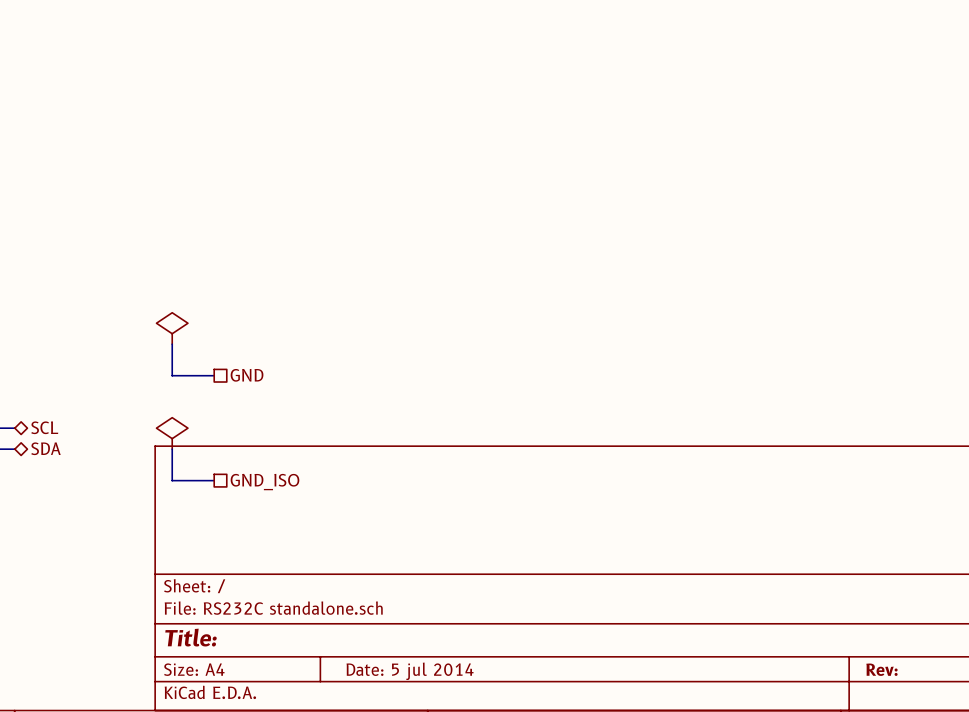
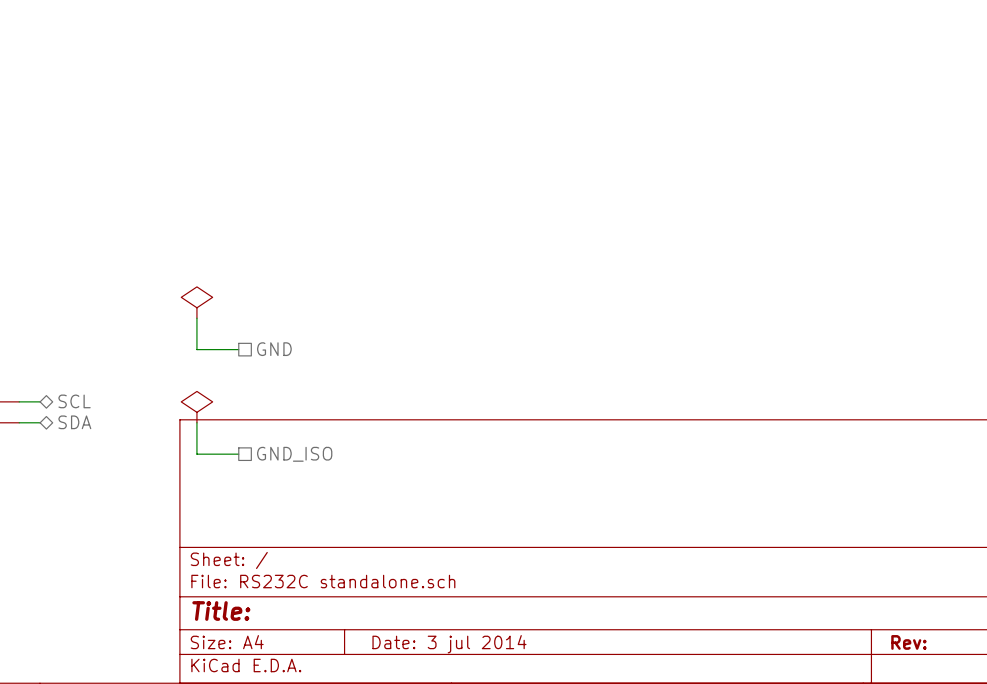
title block: Date: 5 jul 2014 (410, 671) -> Date: 3 jul 2014 (449, 644)

